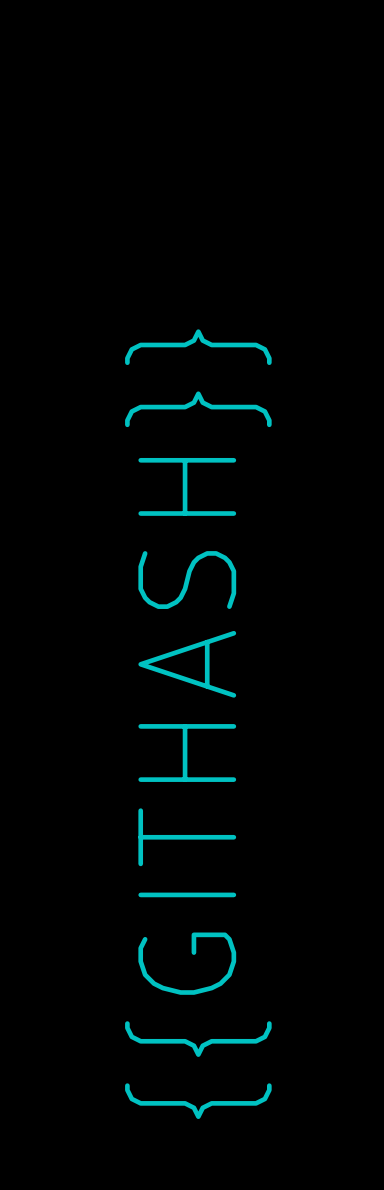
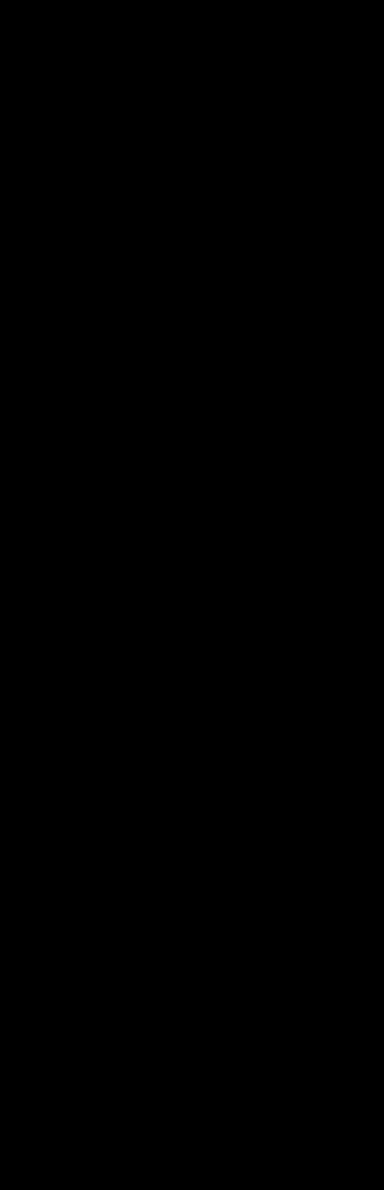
text: {{GITHASH}} (198, 724) -> none

